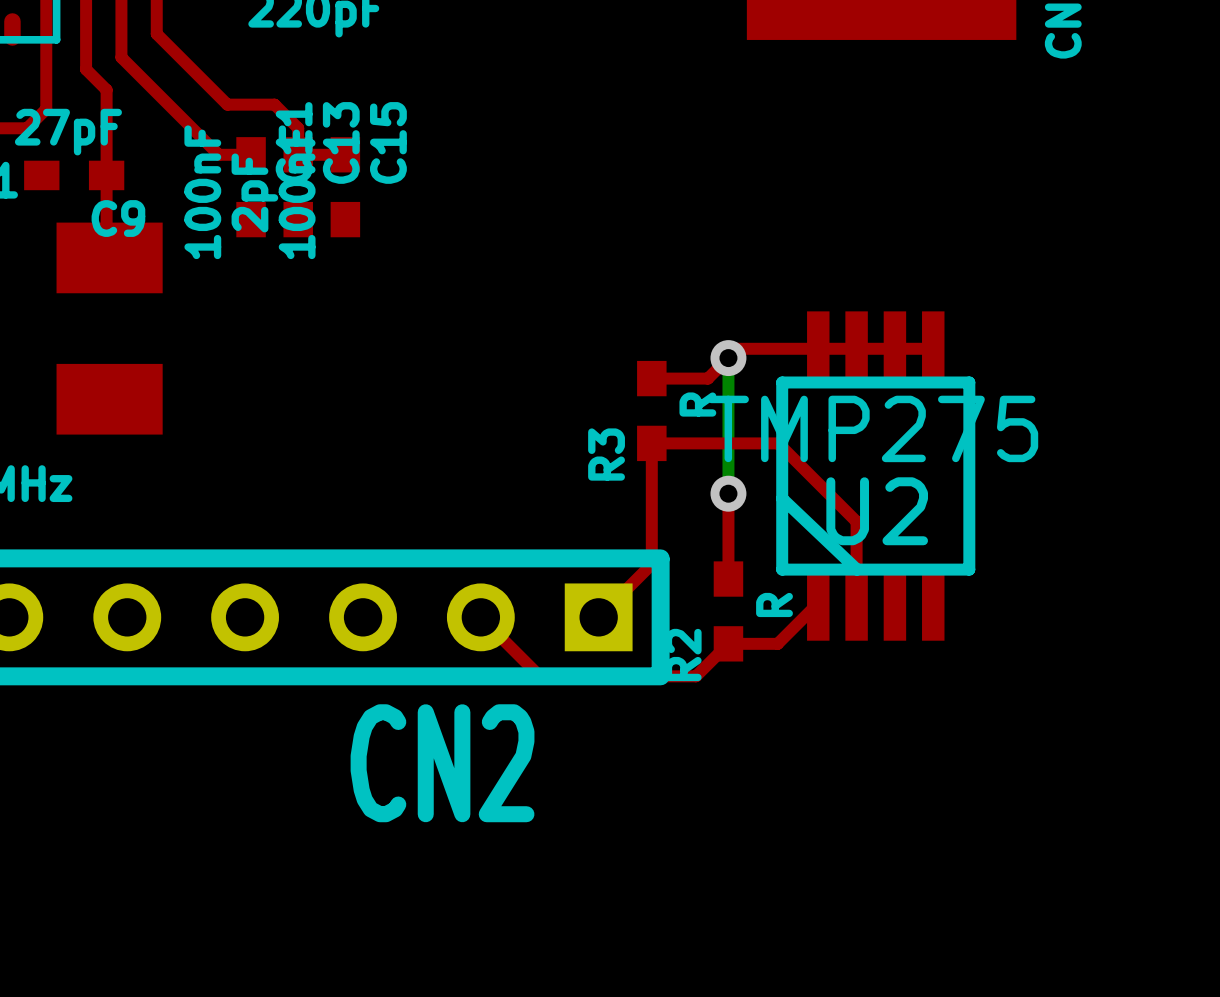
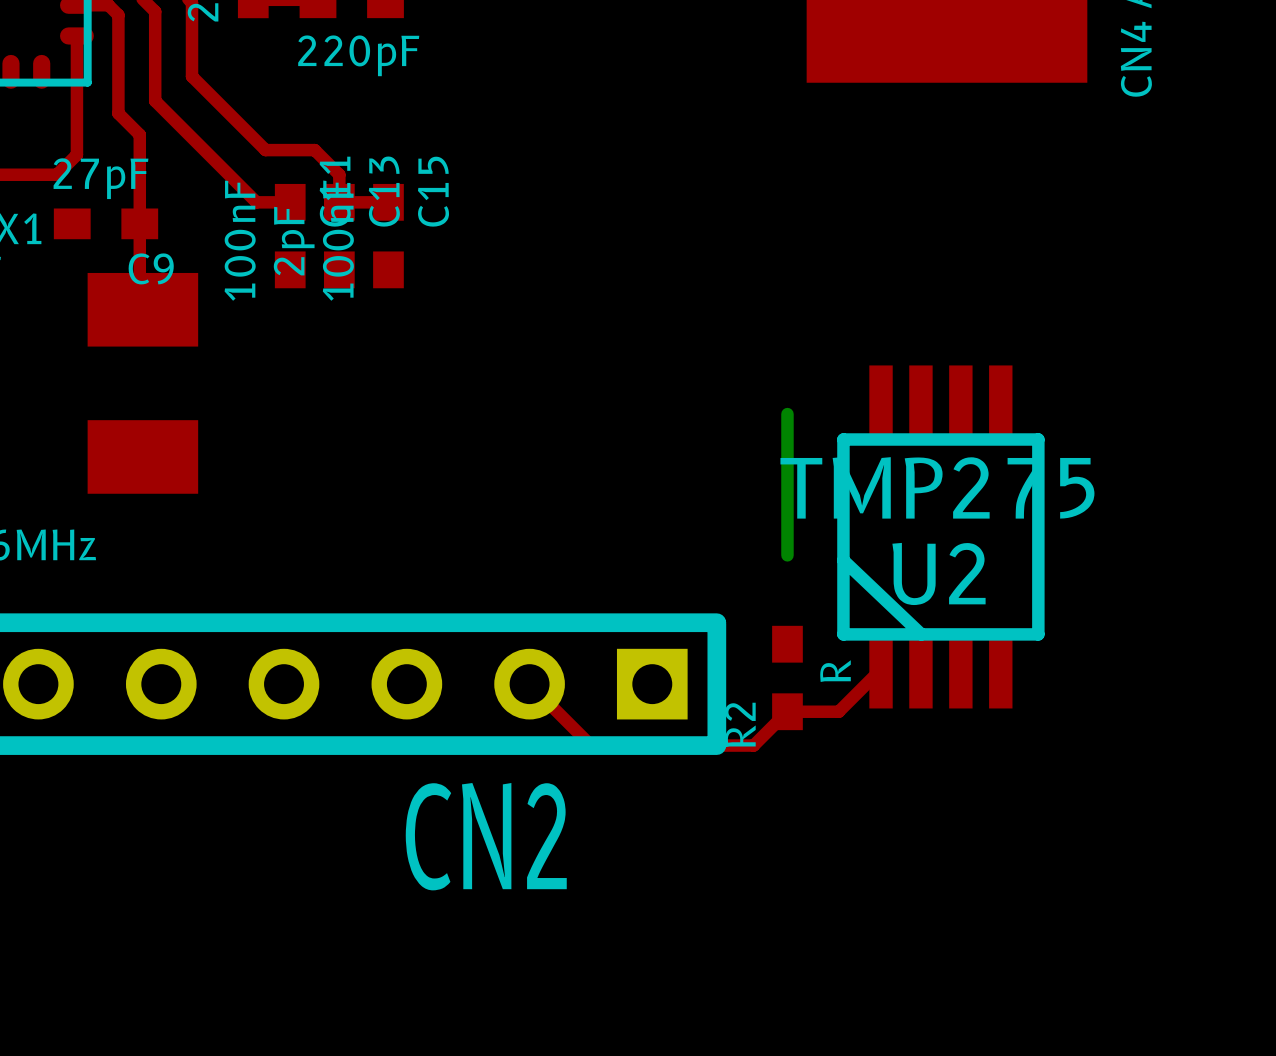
top track: (933, 348) (737, 348) (707, 378) (651, 378) -> none
via: (728, 358) -> none
R3: R (651, 410) -> none
top track: (728, 493) (728, 579) -> none
via: (728, 493) -> none
top track: (856, 603) (856, 521) (778, 443) (651, 443) (651, 564) (598, 617) -> none

